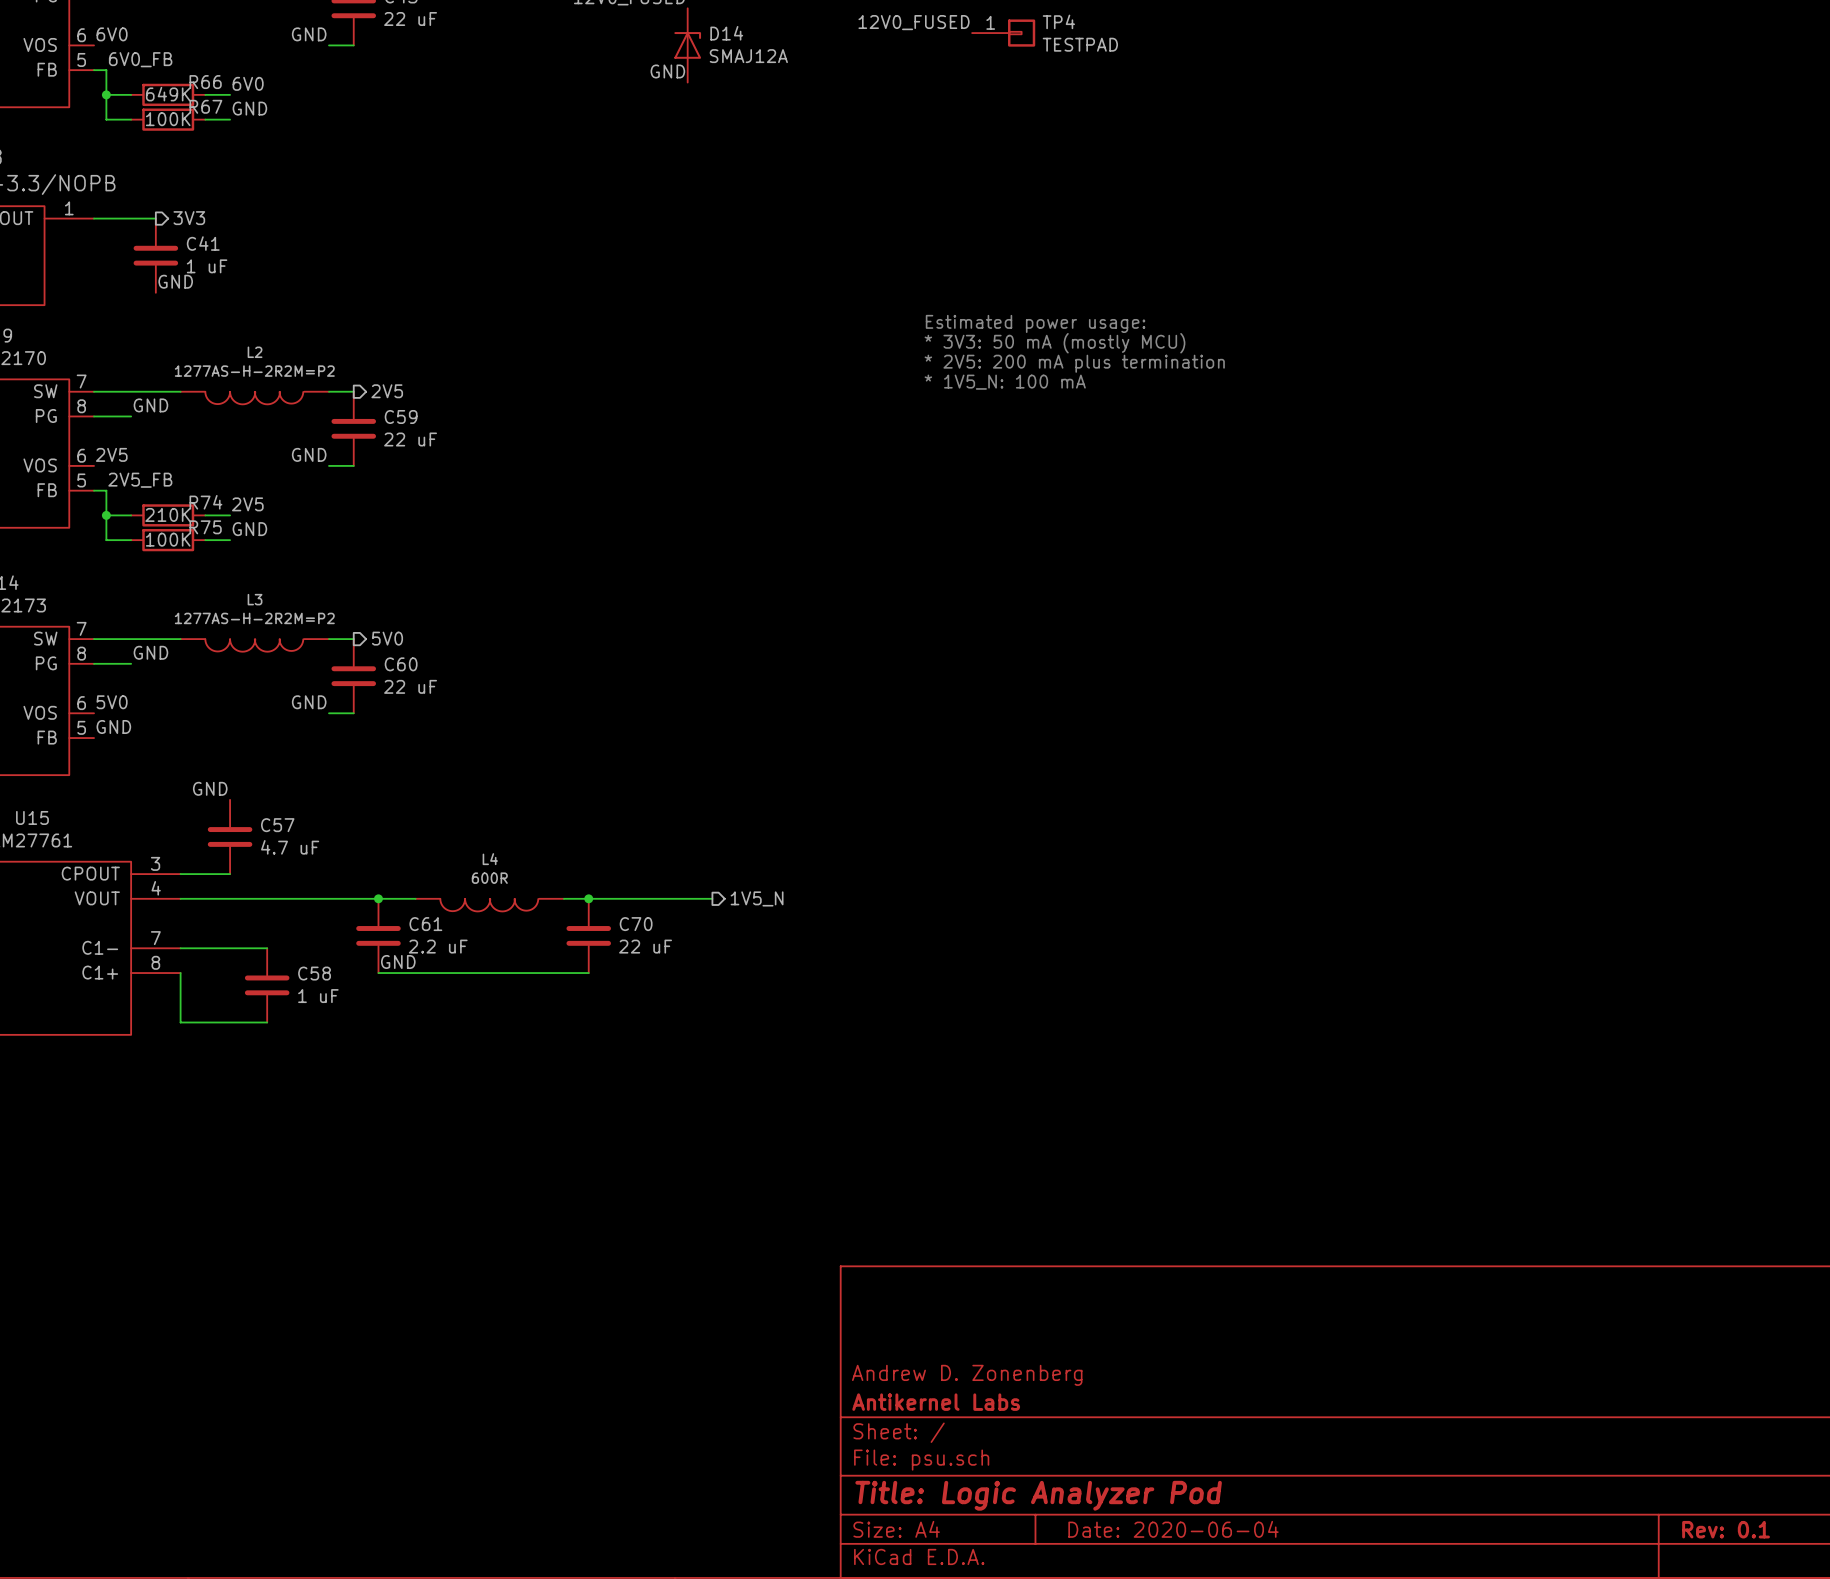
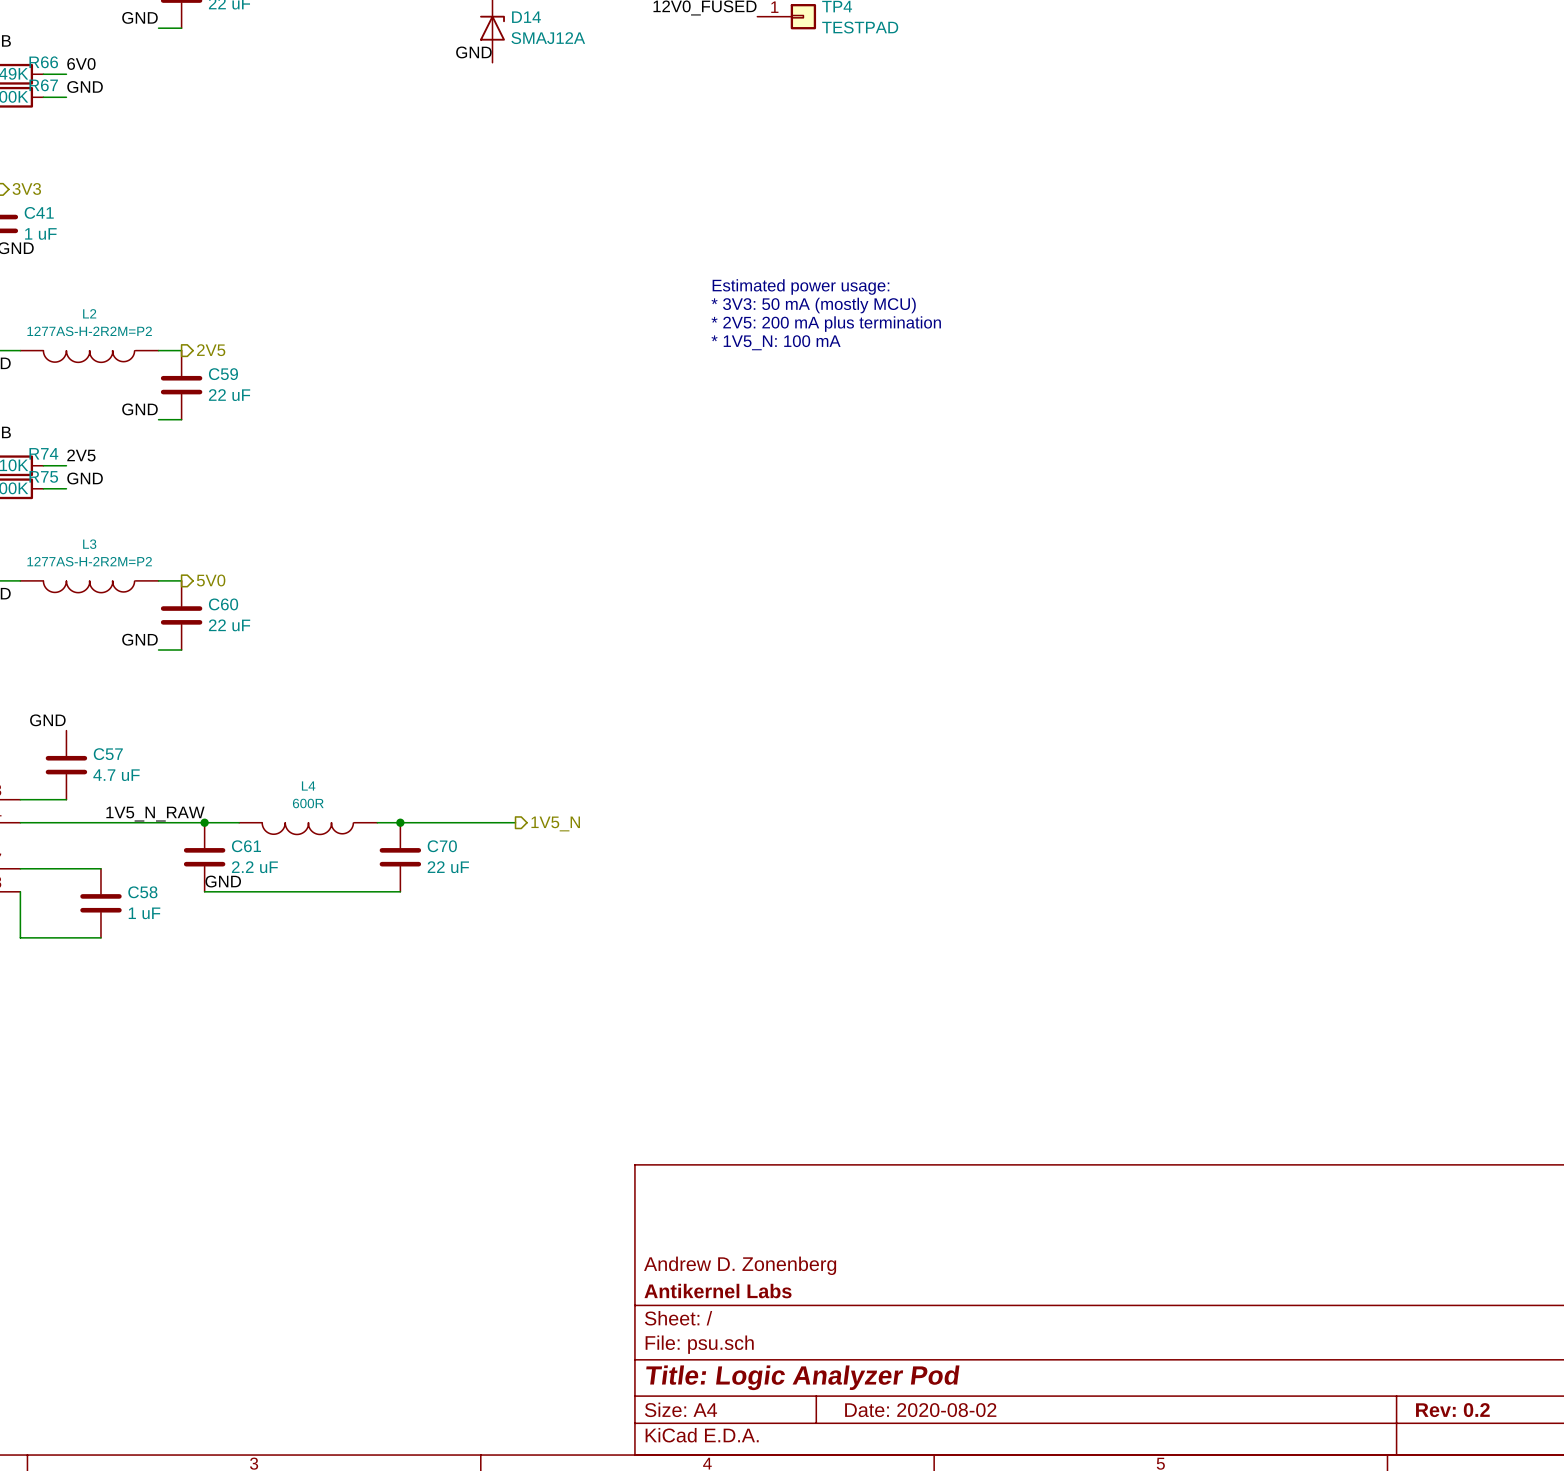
label: none -> 1V5_N_RAW (155, 814)
title block: Date: 2020-06-04 (1173, 1529) -> Date: 2020-08-02 (920, 1410)
title block: Rev: 0.1 (1726, 1529) -> Rev: 0.2 (1452, 1410)

